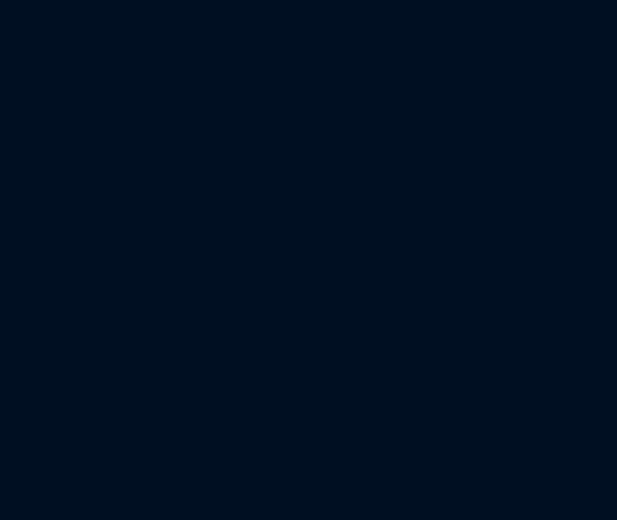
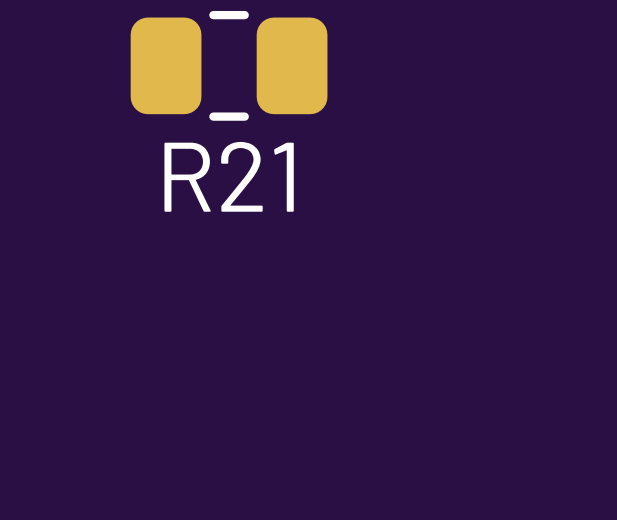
R21: none -> (229, 65)

